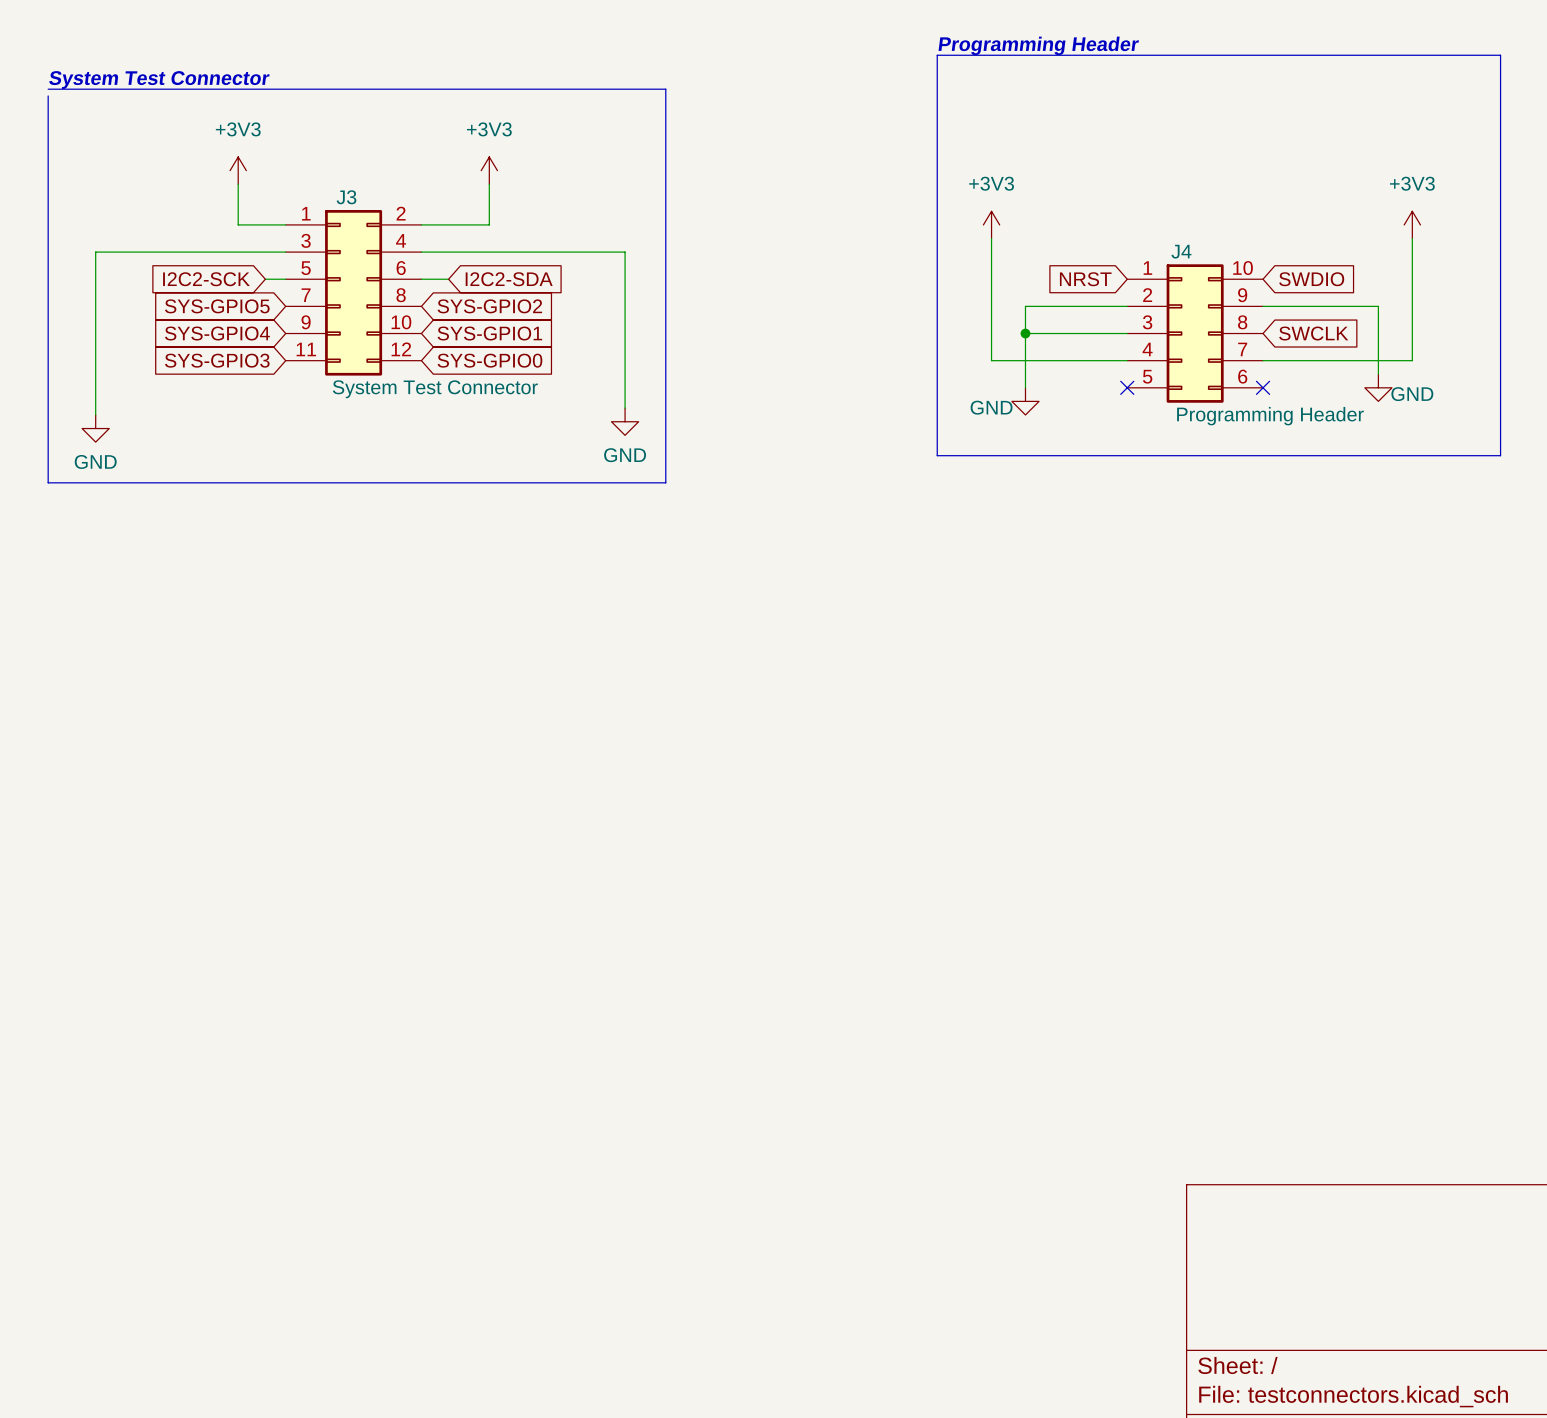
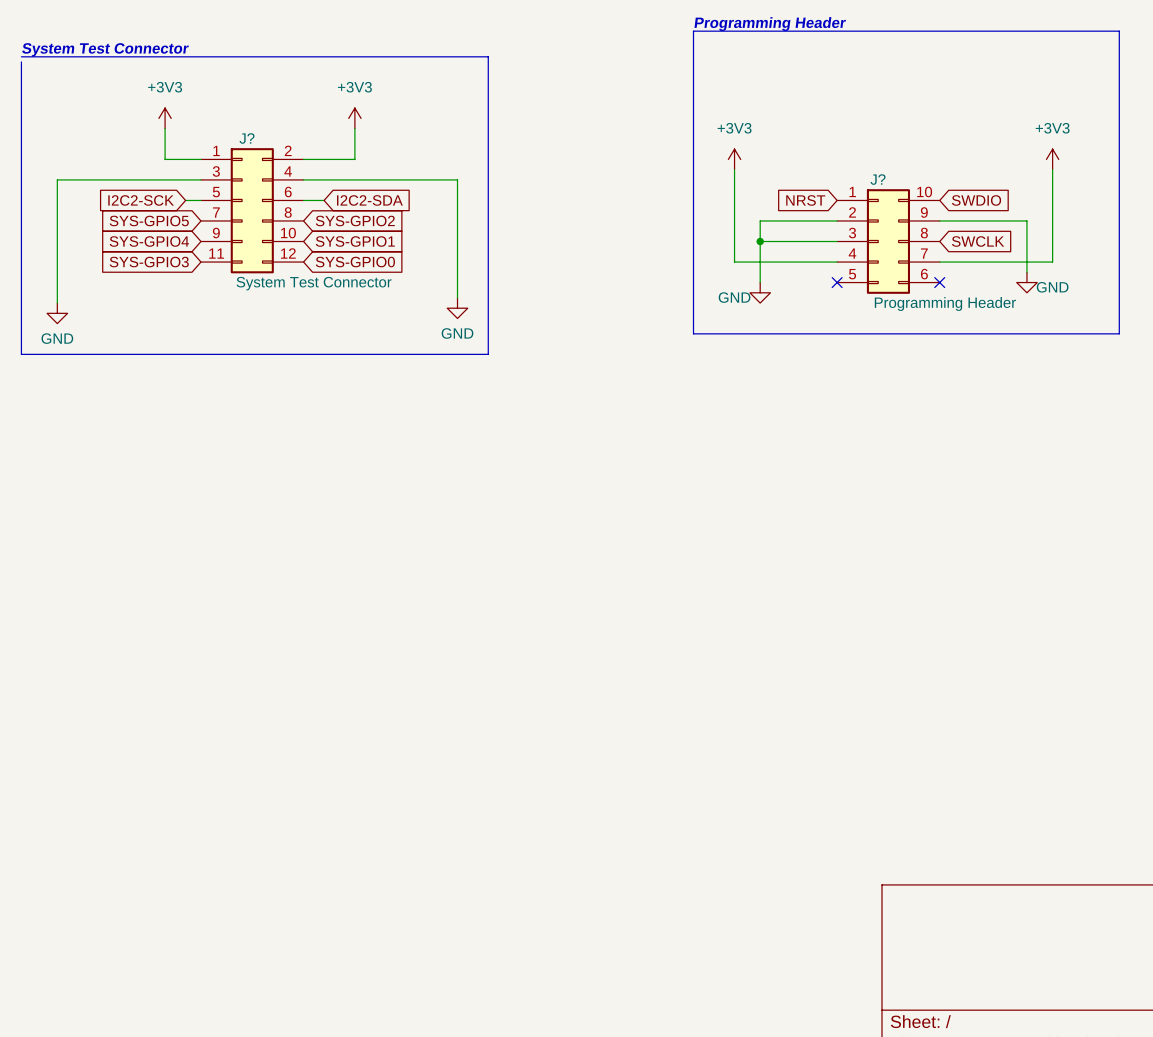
J3 name: J3 (346, 197) -> J? (247, 138)
J4 name: J4 (1181, 251) -> J? (878, 179)

